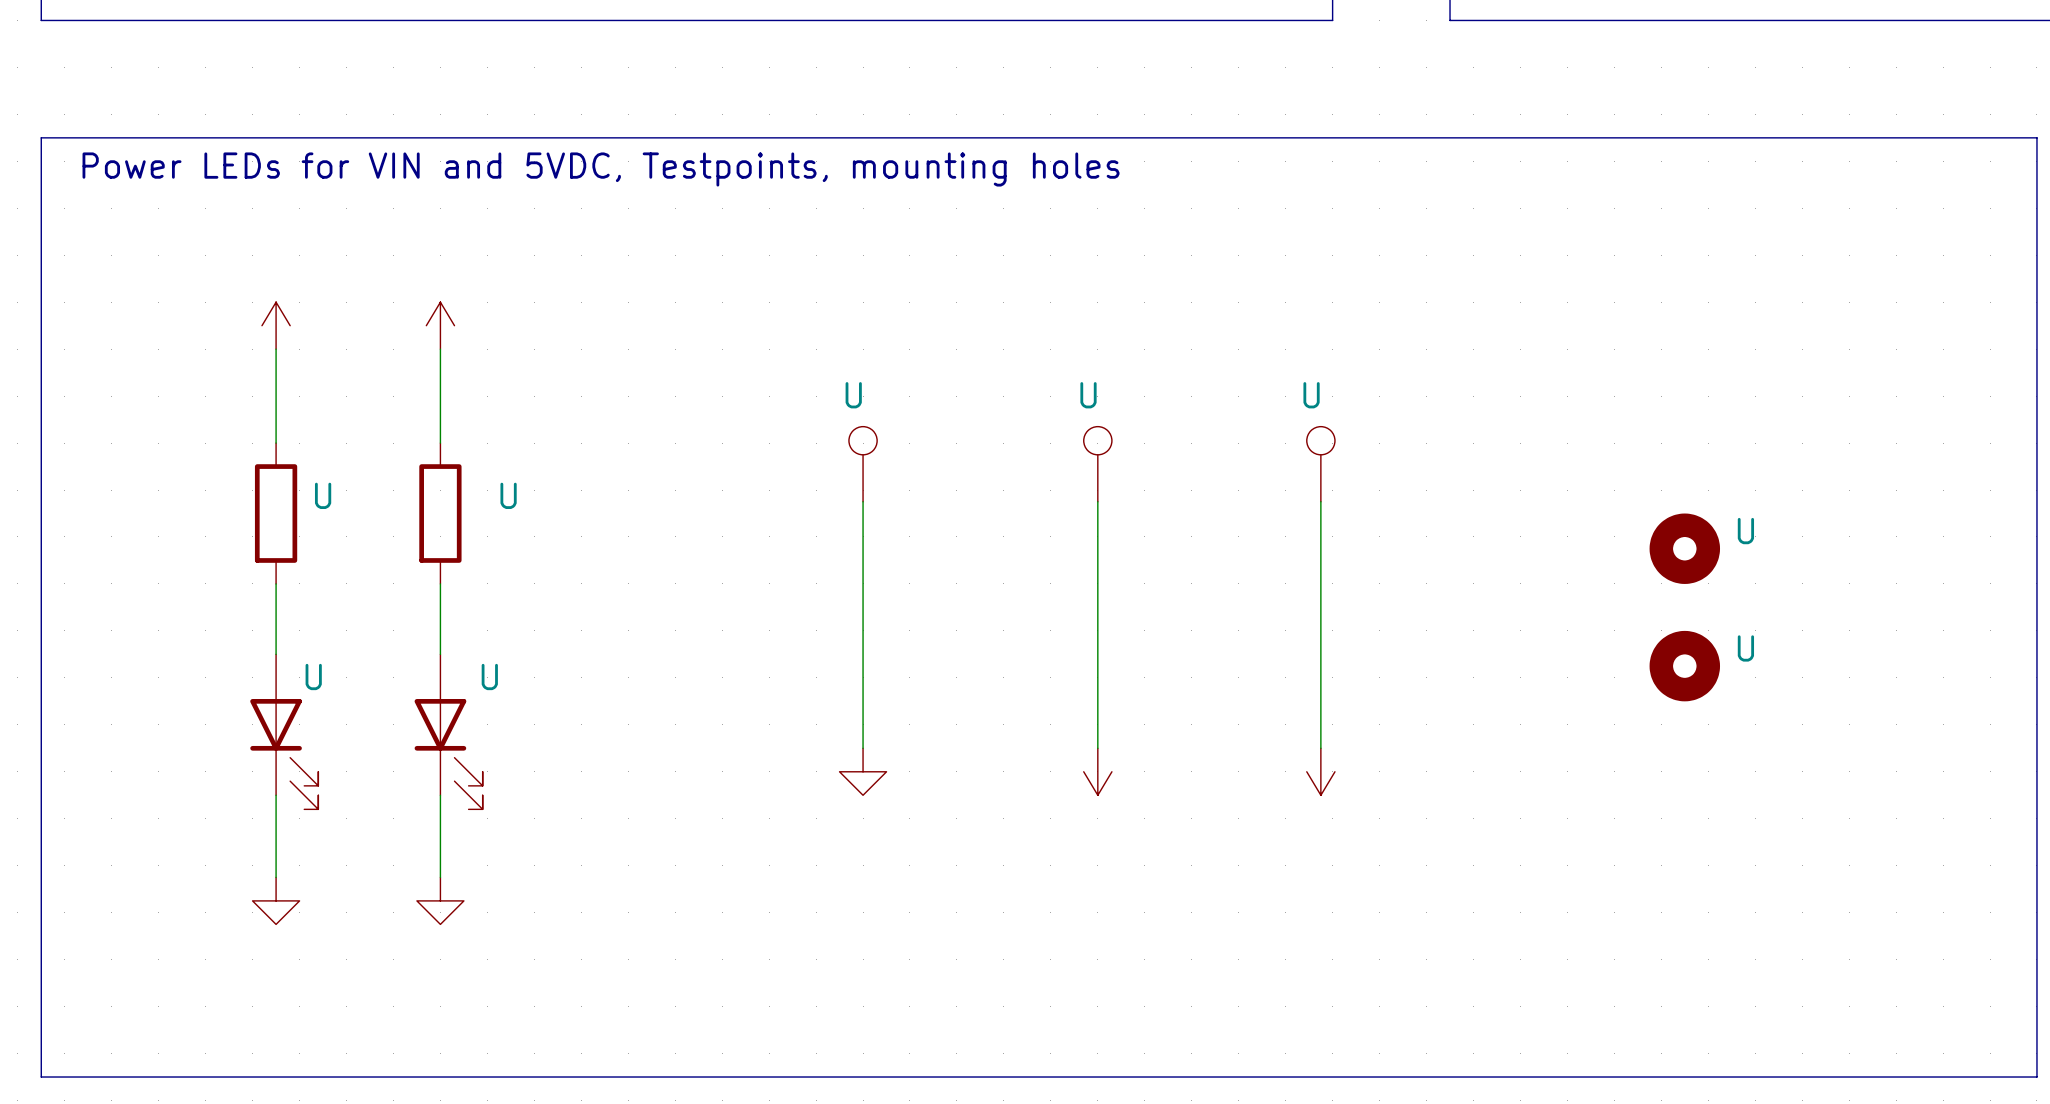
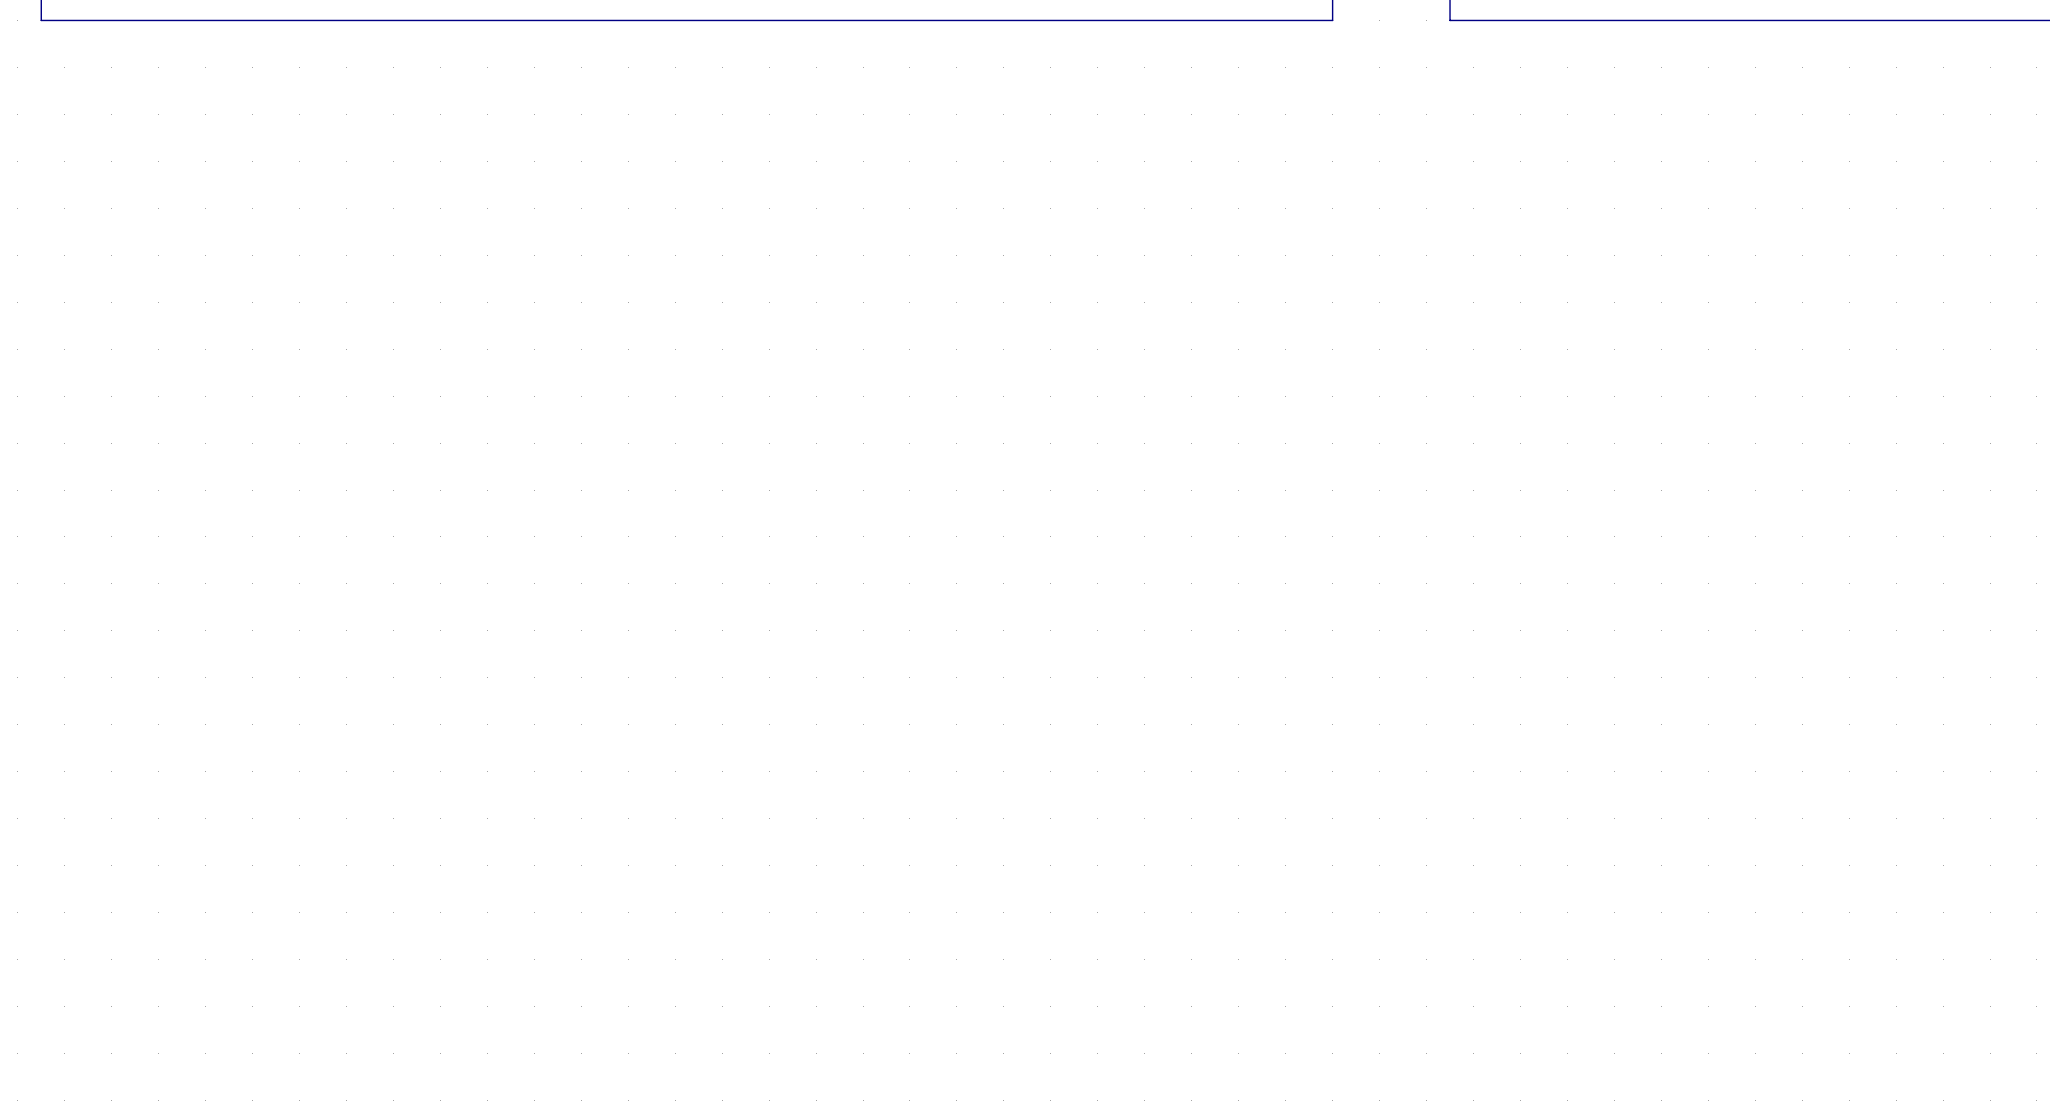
line: (41, 137) (2036, 137) (2036, 1077) (41, 1077) (41, 137) -> none
text: Power LEDs for VIN and 5VDC, Testpoints, mounting holes (601, 169) -> none
power symbol: (276, 325) -> none
power symbol: (440, 325) -> none
wire: (276, 349) (276, 443) -> none
wire: (440, 349) (440, 443) -> none
U: (863, 464) -> none
U: (1097, 464) -> none
U: (1320, 464) -> none
wire: (863, 501) (863, 748) -> none
wire: (1097, 501) (1097, 748) -> none
wire: (1320, 501) (1320, 748) -> none
U: (276, 513) -> none
U: (440, 513) -> none
U: (1684, 548) -> none
wire: (276, 583) (276, 654) -> none
wire: (440, 583) (440, 654) -> none
U: (1684, 666) -> none
U: (284, 731) -> none
U: (448, 731) -> none
power symbol: (863, 771) -> none
power symbol: (1097, 771) -> none
power symbol: (1320, 771) -> none
wire: (276, 795) (276, 877) -> none
wire: (440, 795) (440, 877) -> none
power symbol: (276, 900) -> none
power symbol: (440, 900) -> none

